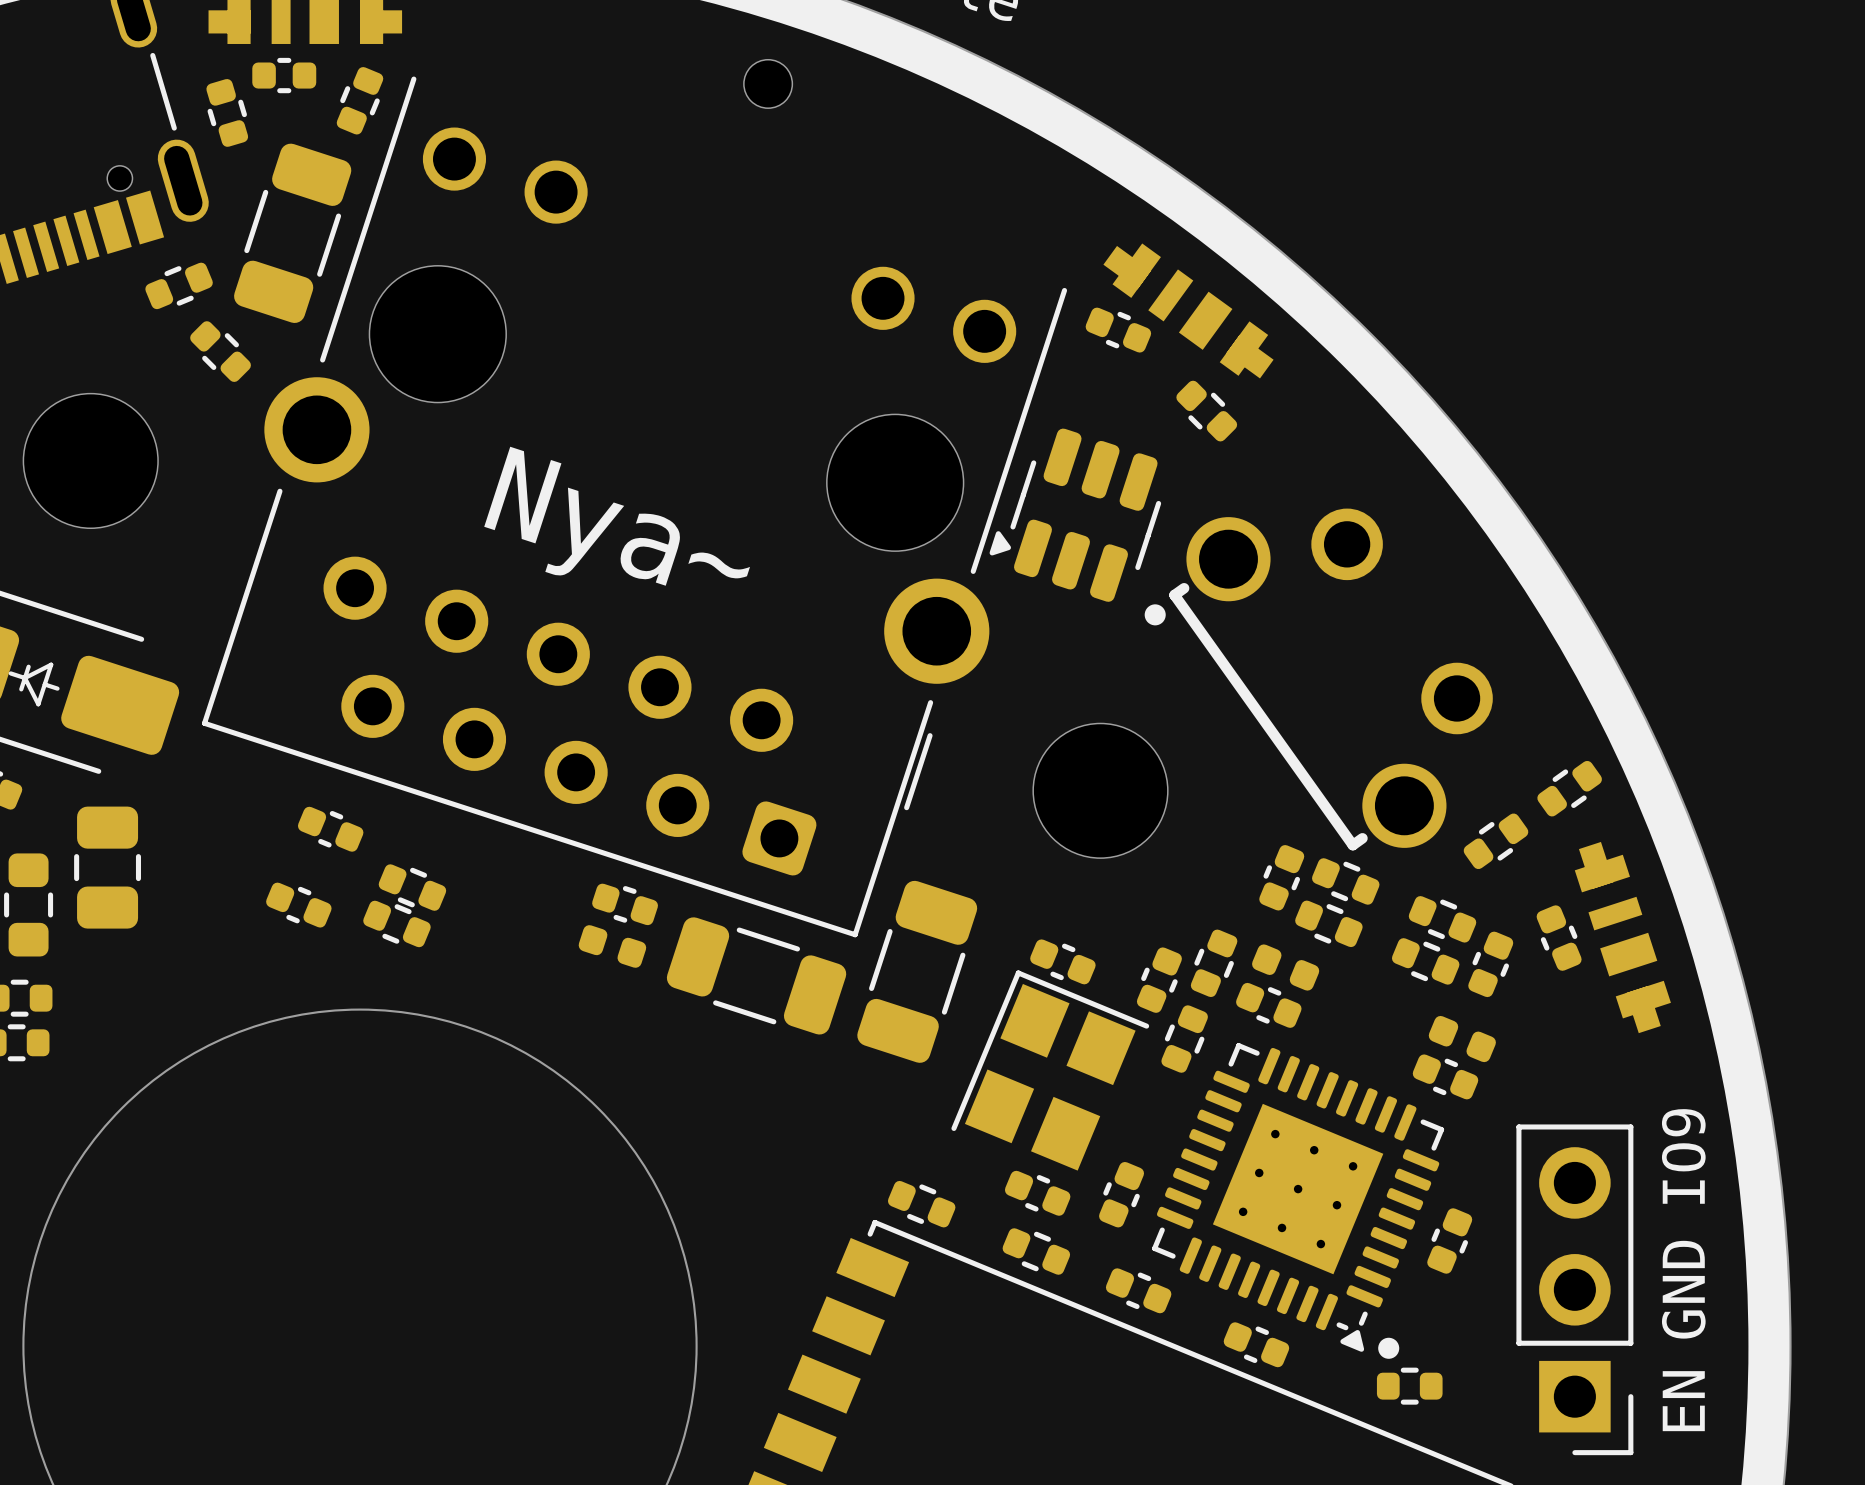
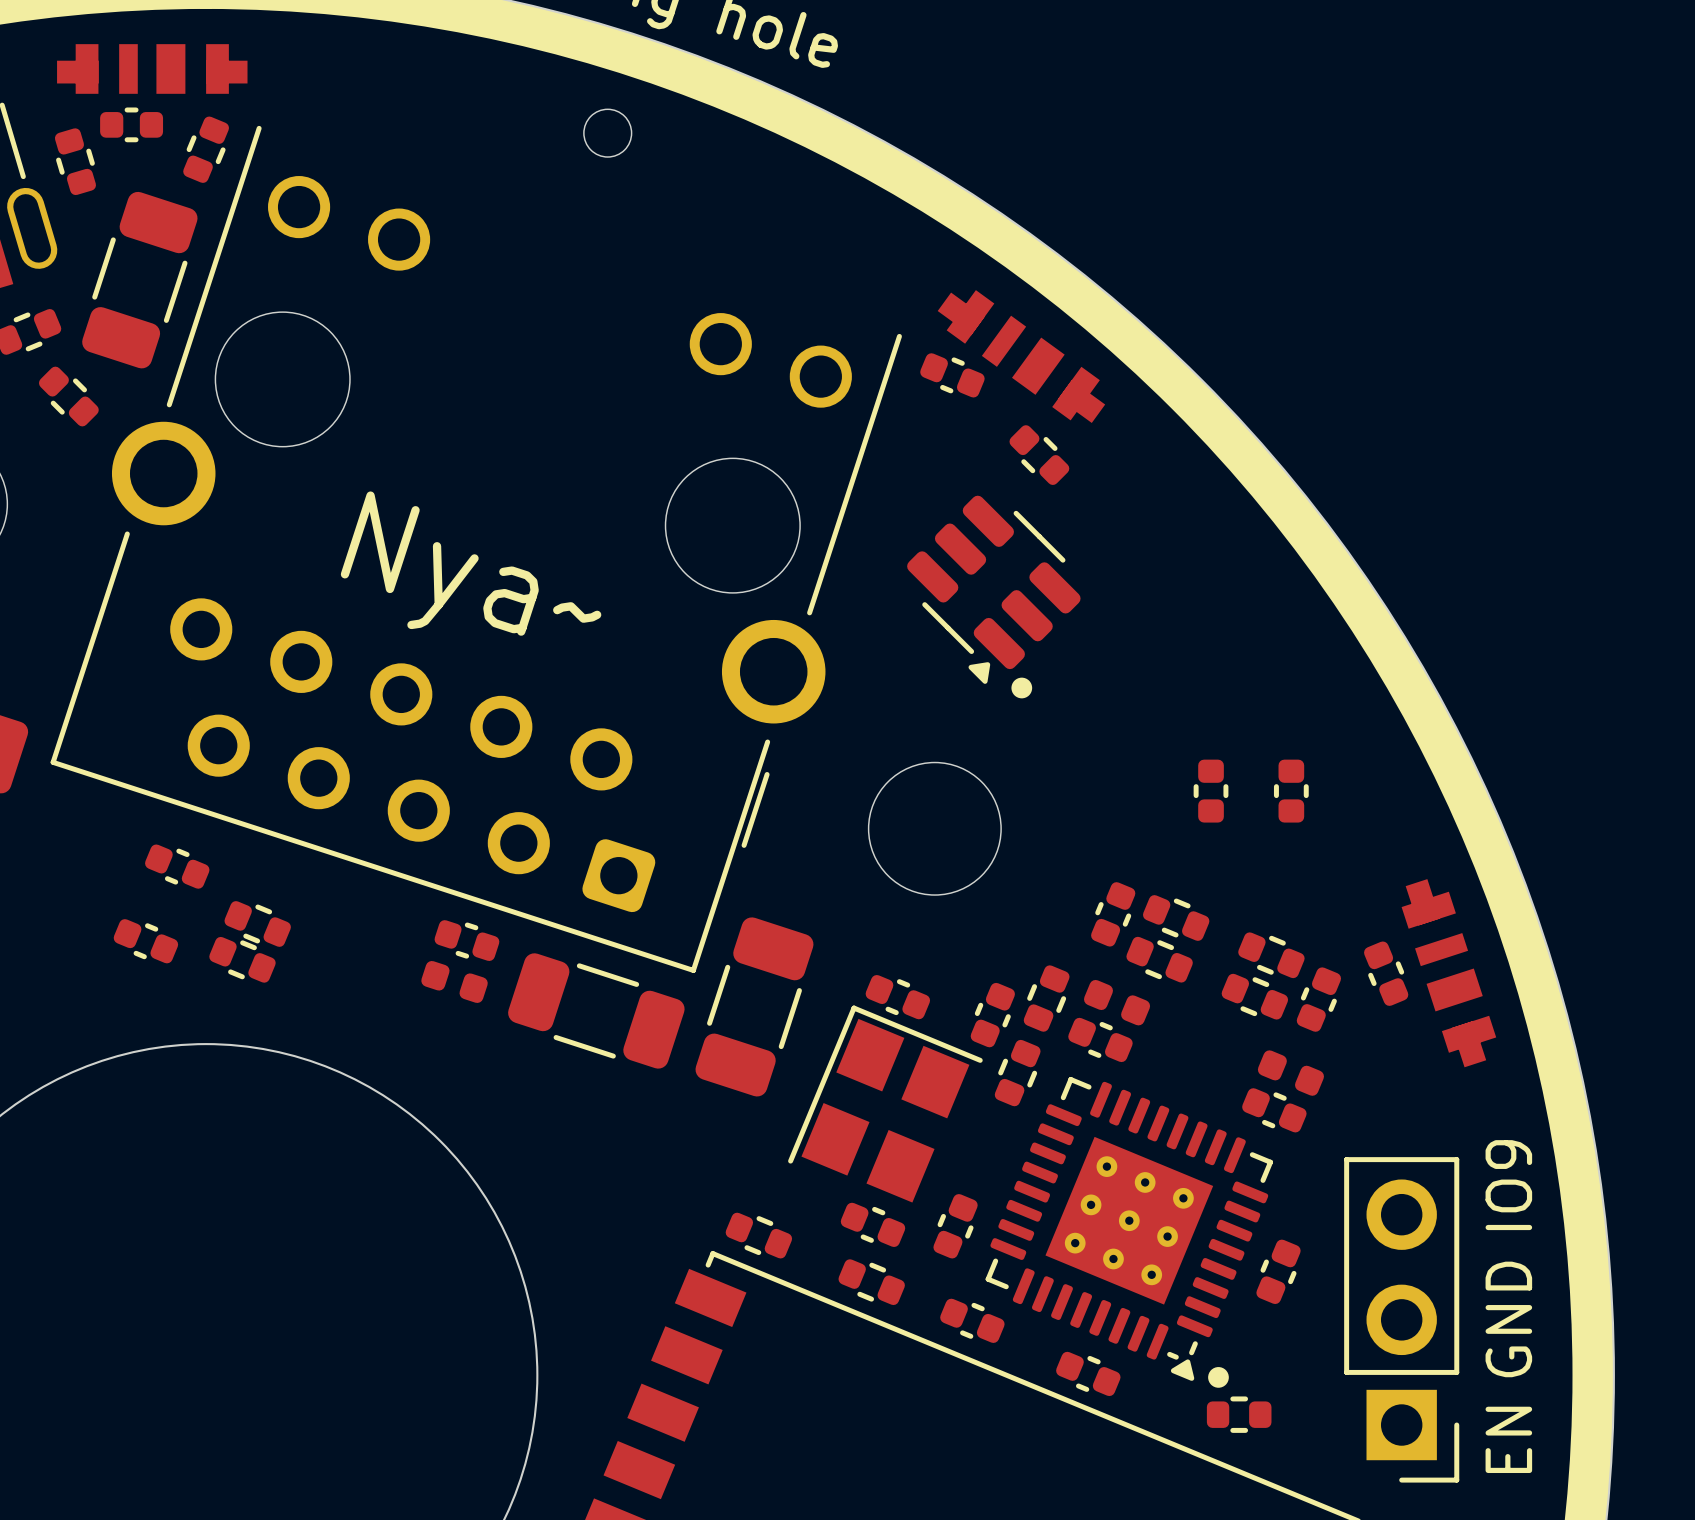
part: (1075, 515) -> none
part: none -> (993, 589)
drawing position: (1155, 614) -> (1021, 688)
part: (1331, 679) -> none
part: none -> (1211, 791)
part: none -> (1291, 791)
part: (1569, 788) -> none
part: (1496, 841) -> none

